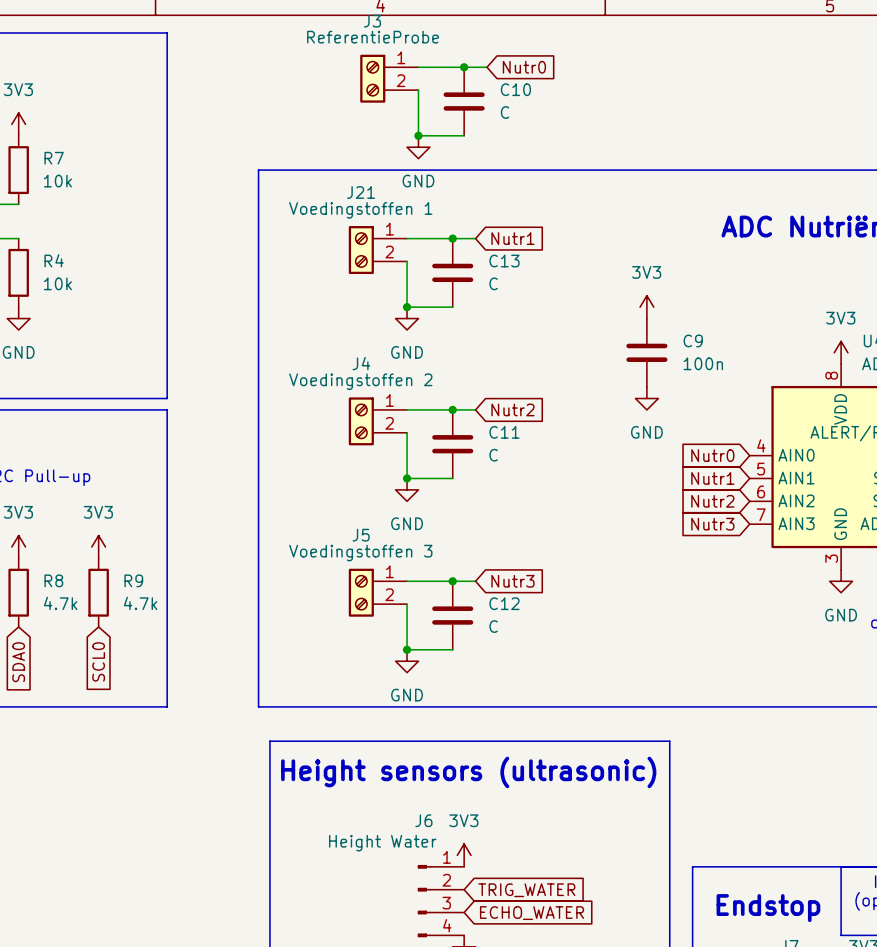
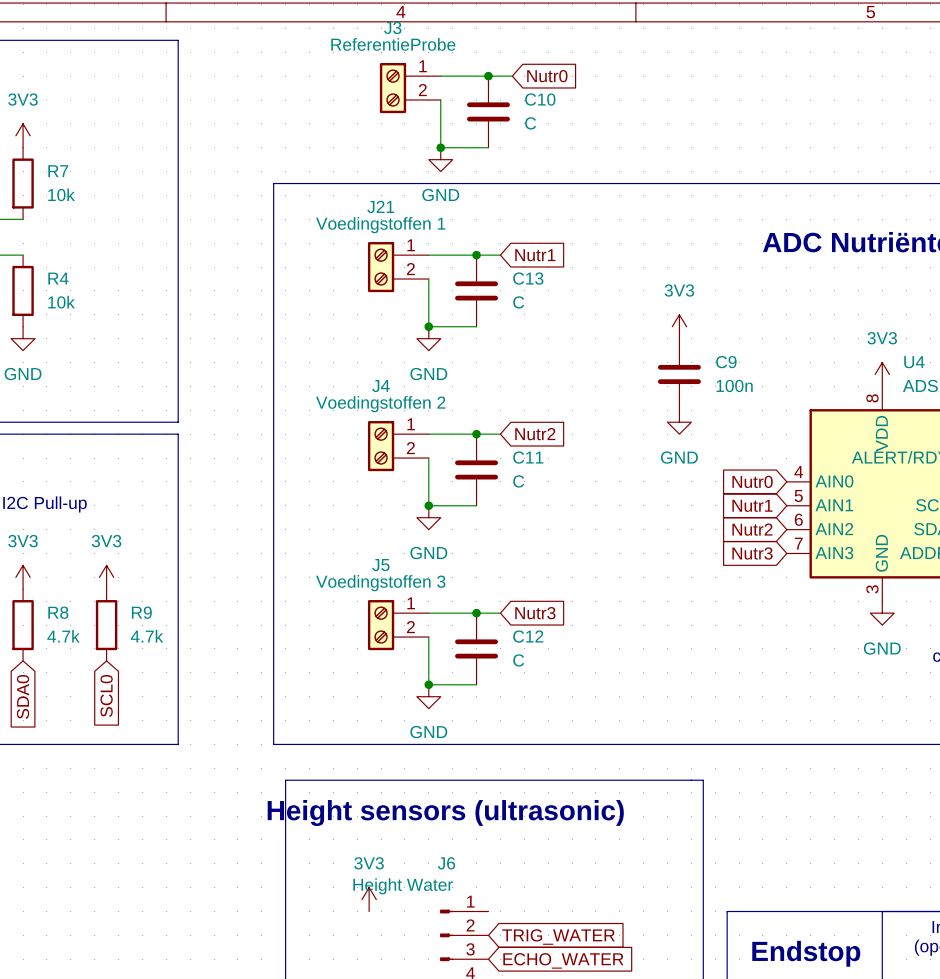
text position: Height sensors (ultrasonic) (468, 772) -> Height sensors (ultrasonic) (445, 813)
power symbol: none -> 3V3 (369, 899)
power symbol: 3V3 (464, 855) -> none

